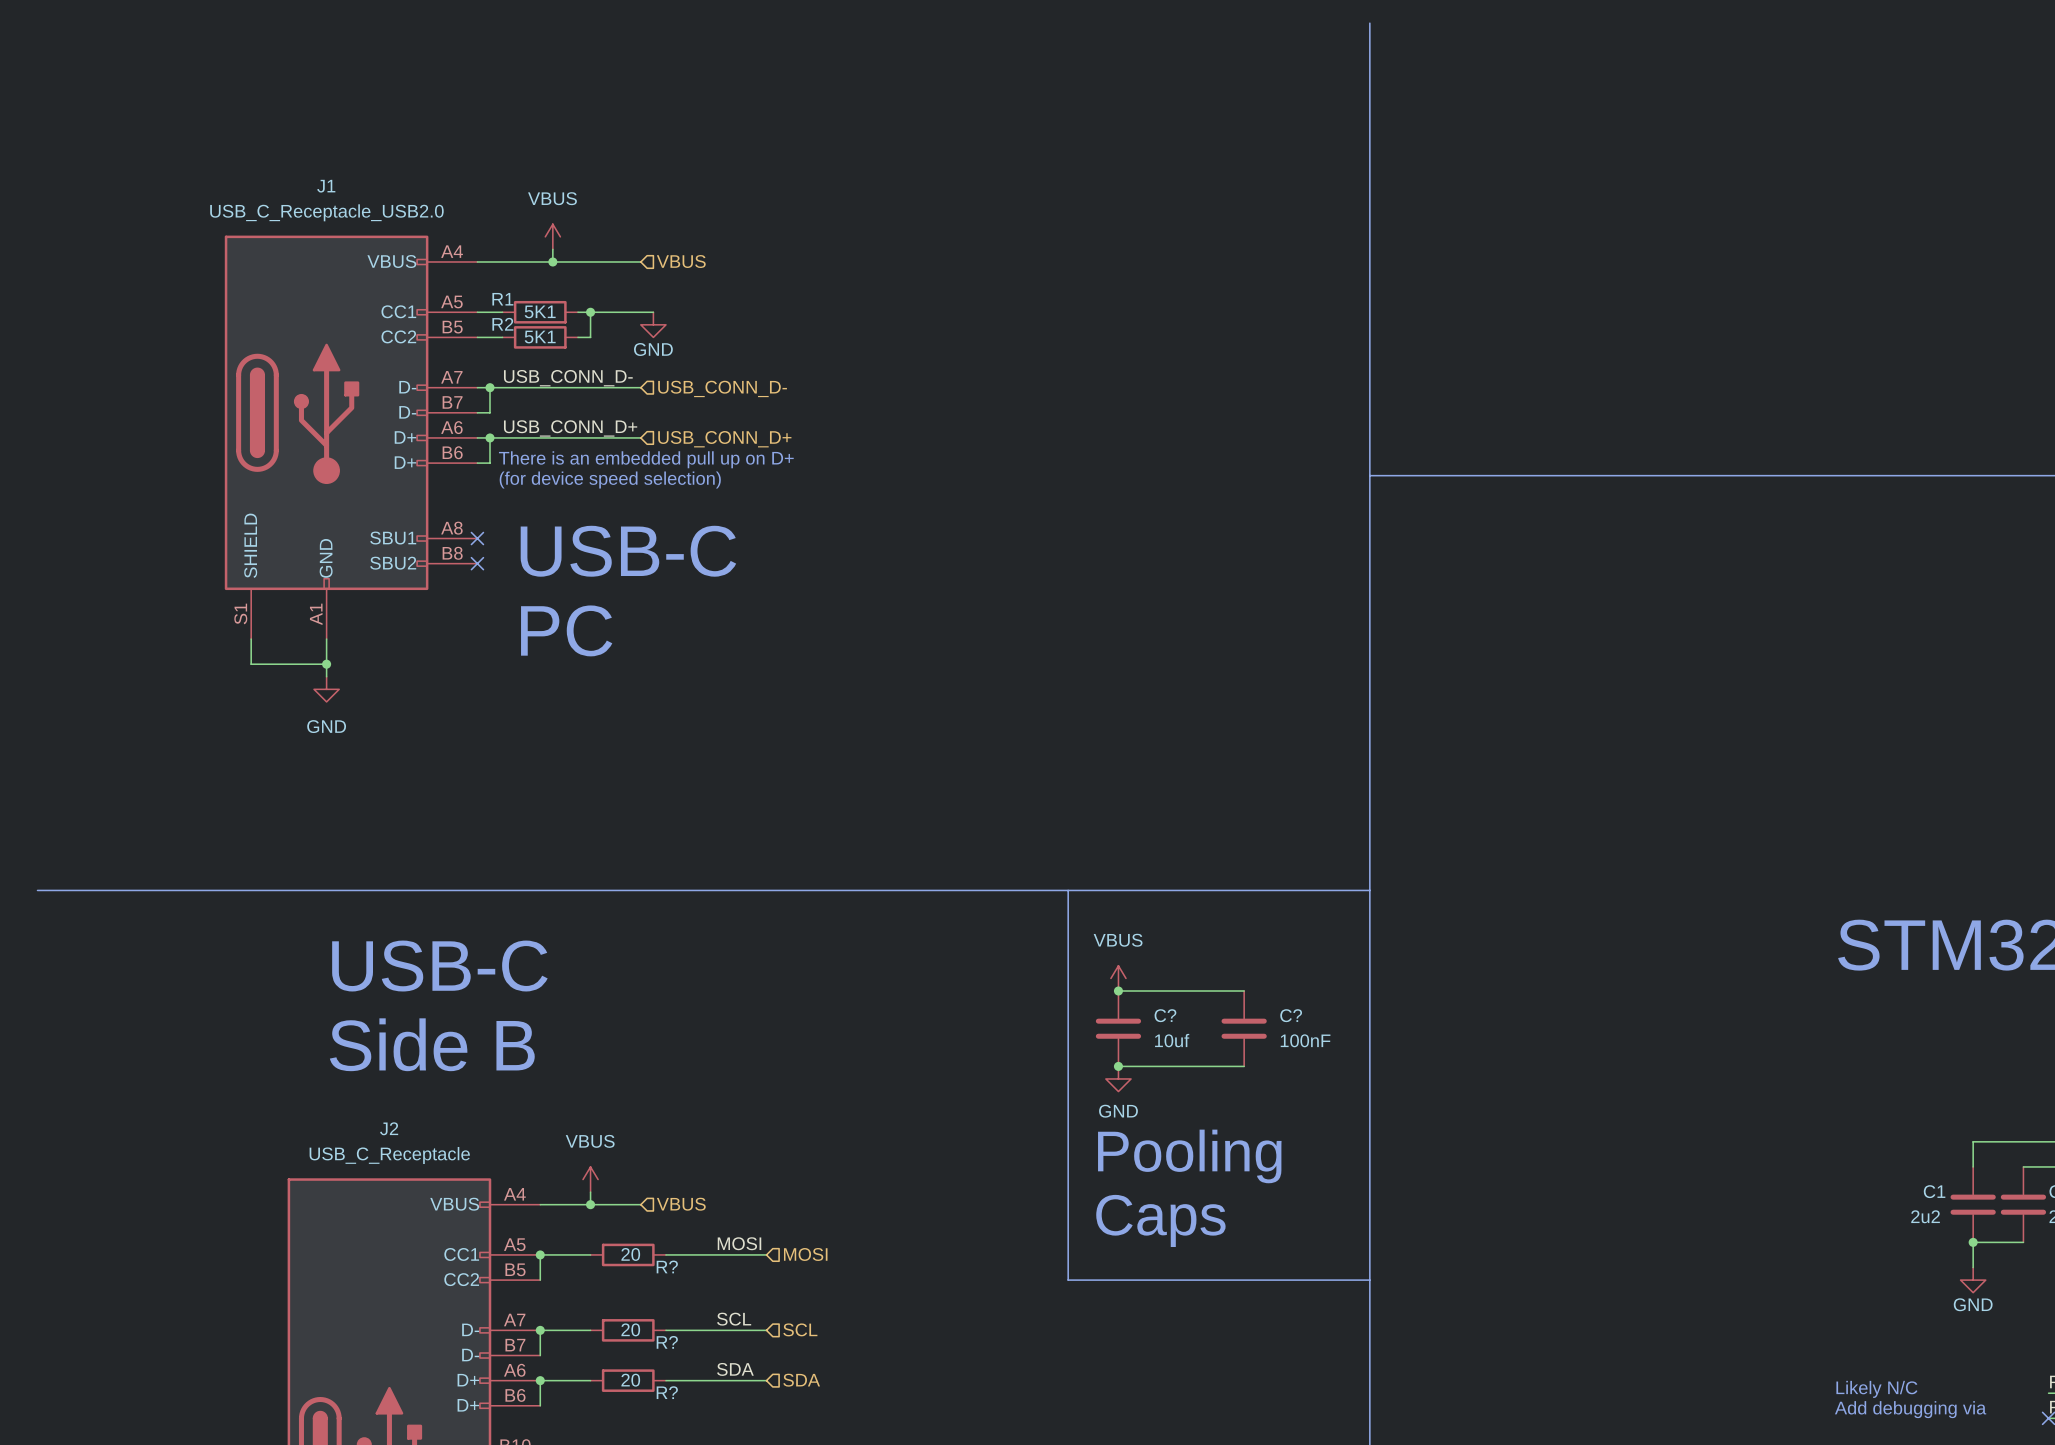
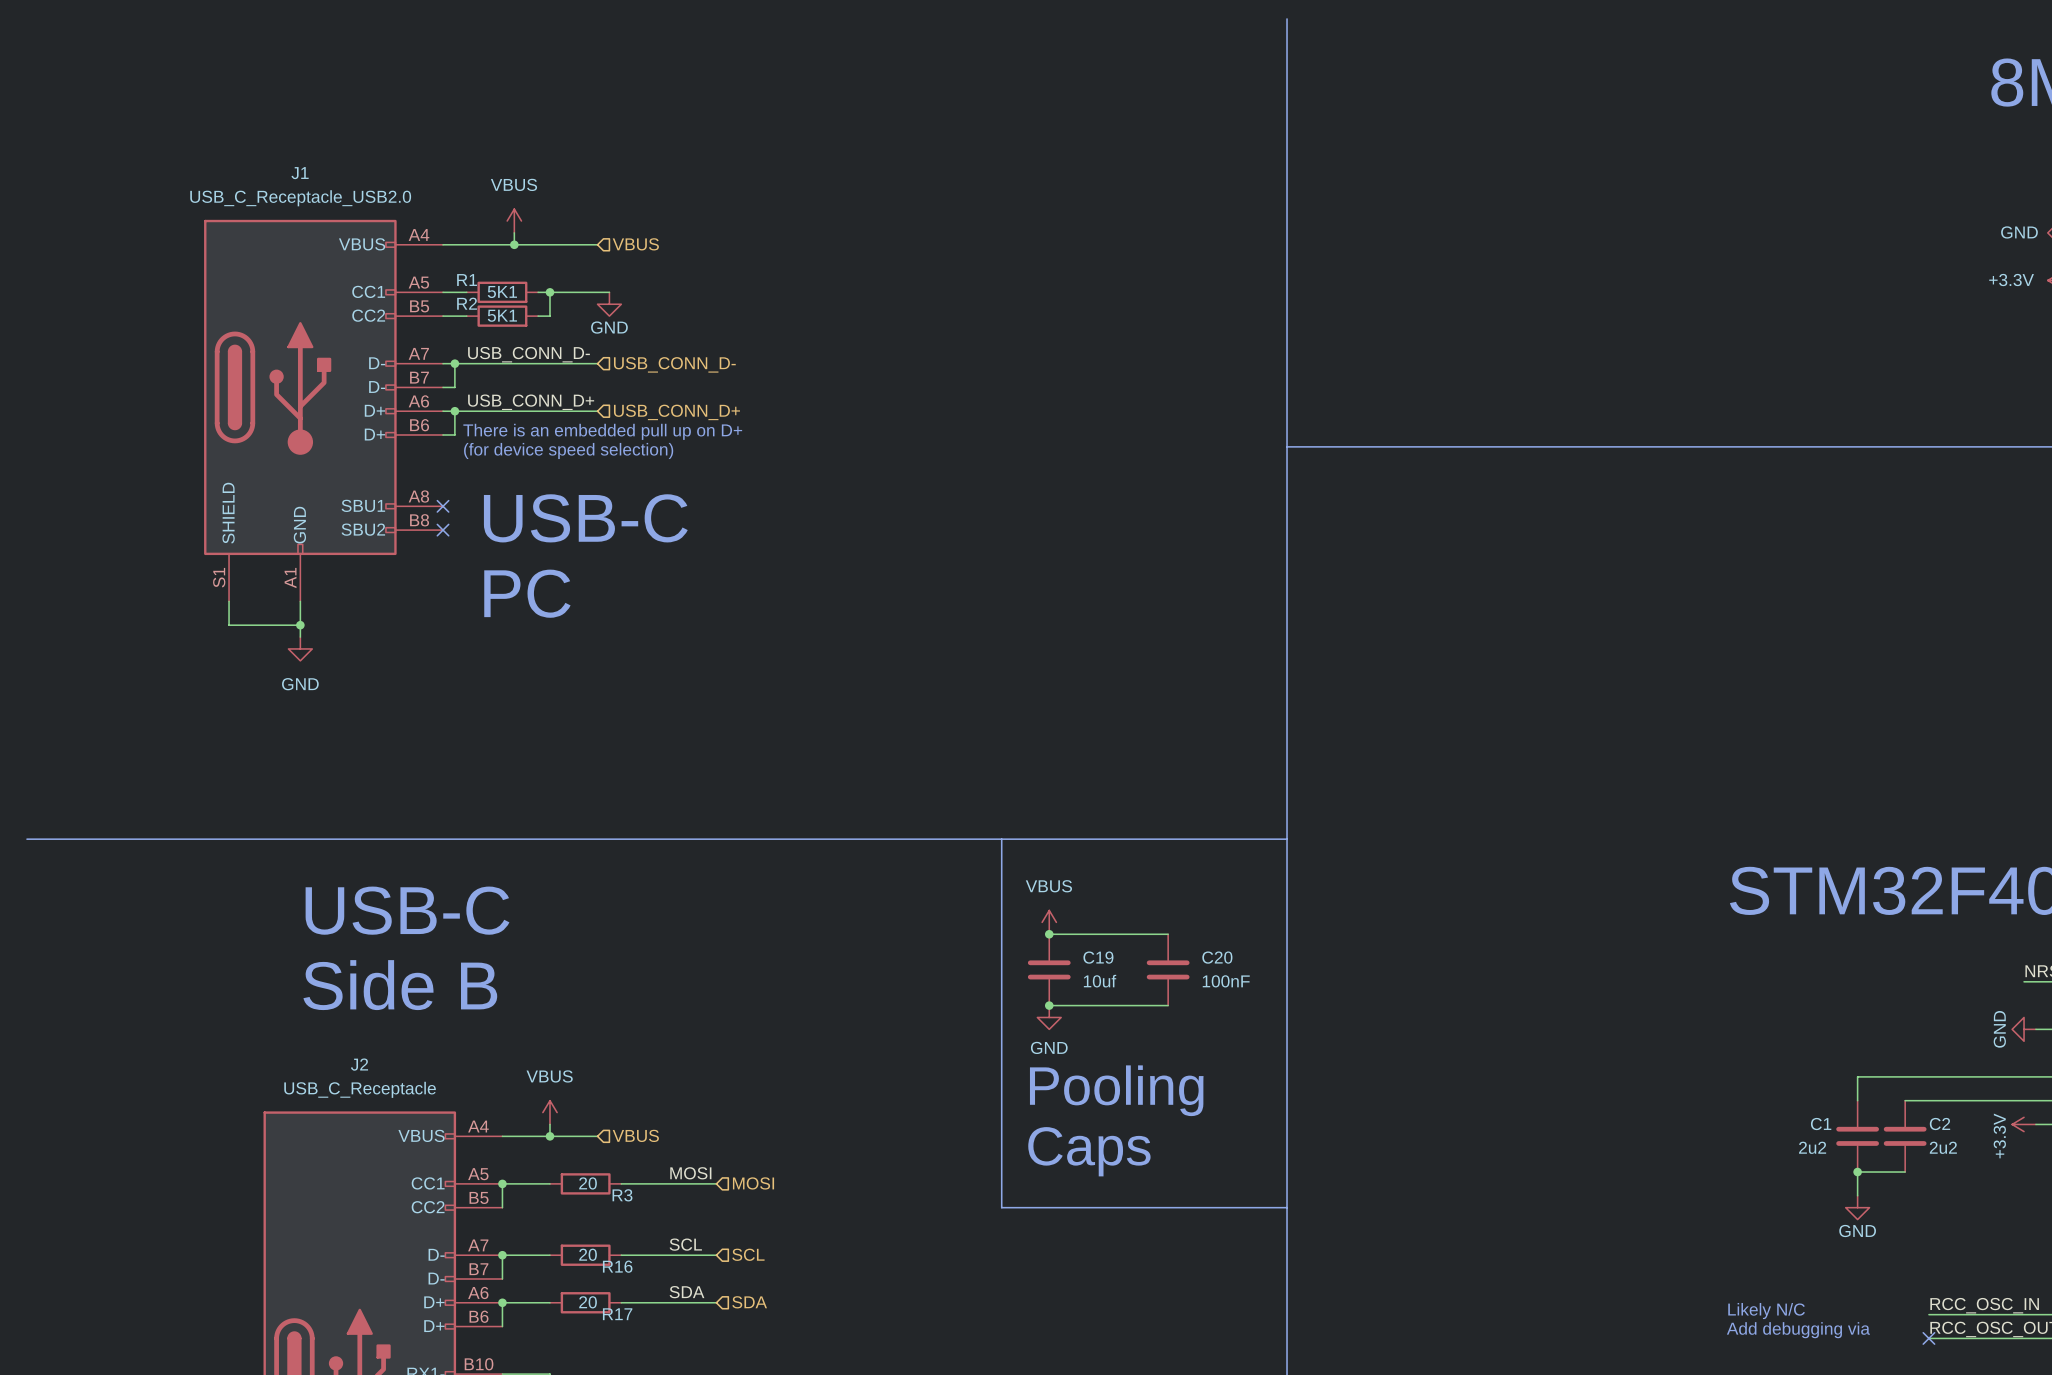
C? name: C? (1165, 1015) -> C19 (1098, 957)
C? name: C? (1291, 1015) -> C20 (1217, 957)
R? name: R? (667, 1266) -> R3 (622, 1195)
R? name: R? (667, 1342) -> R16 (617, 1266)
R? name: R? (667, 1392) -> R17 (617, 1314)

